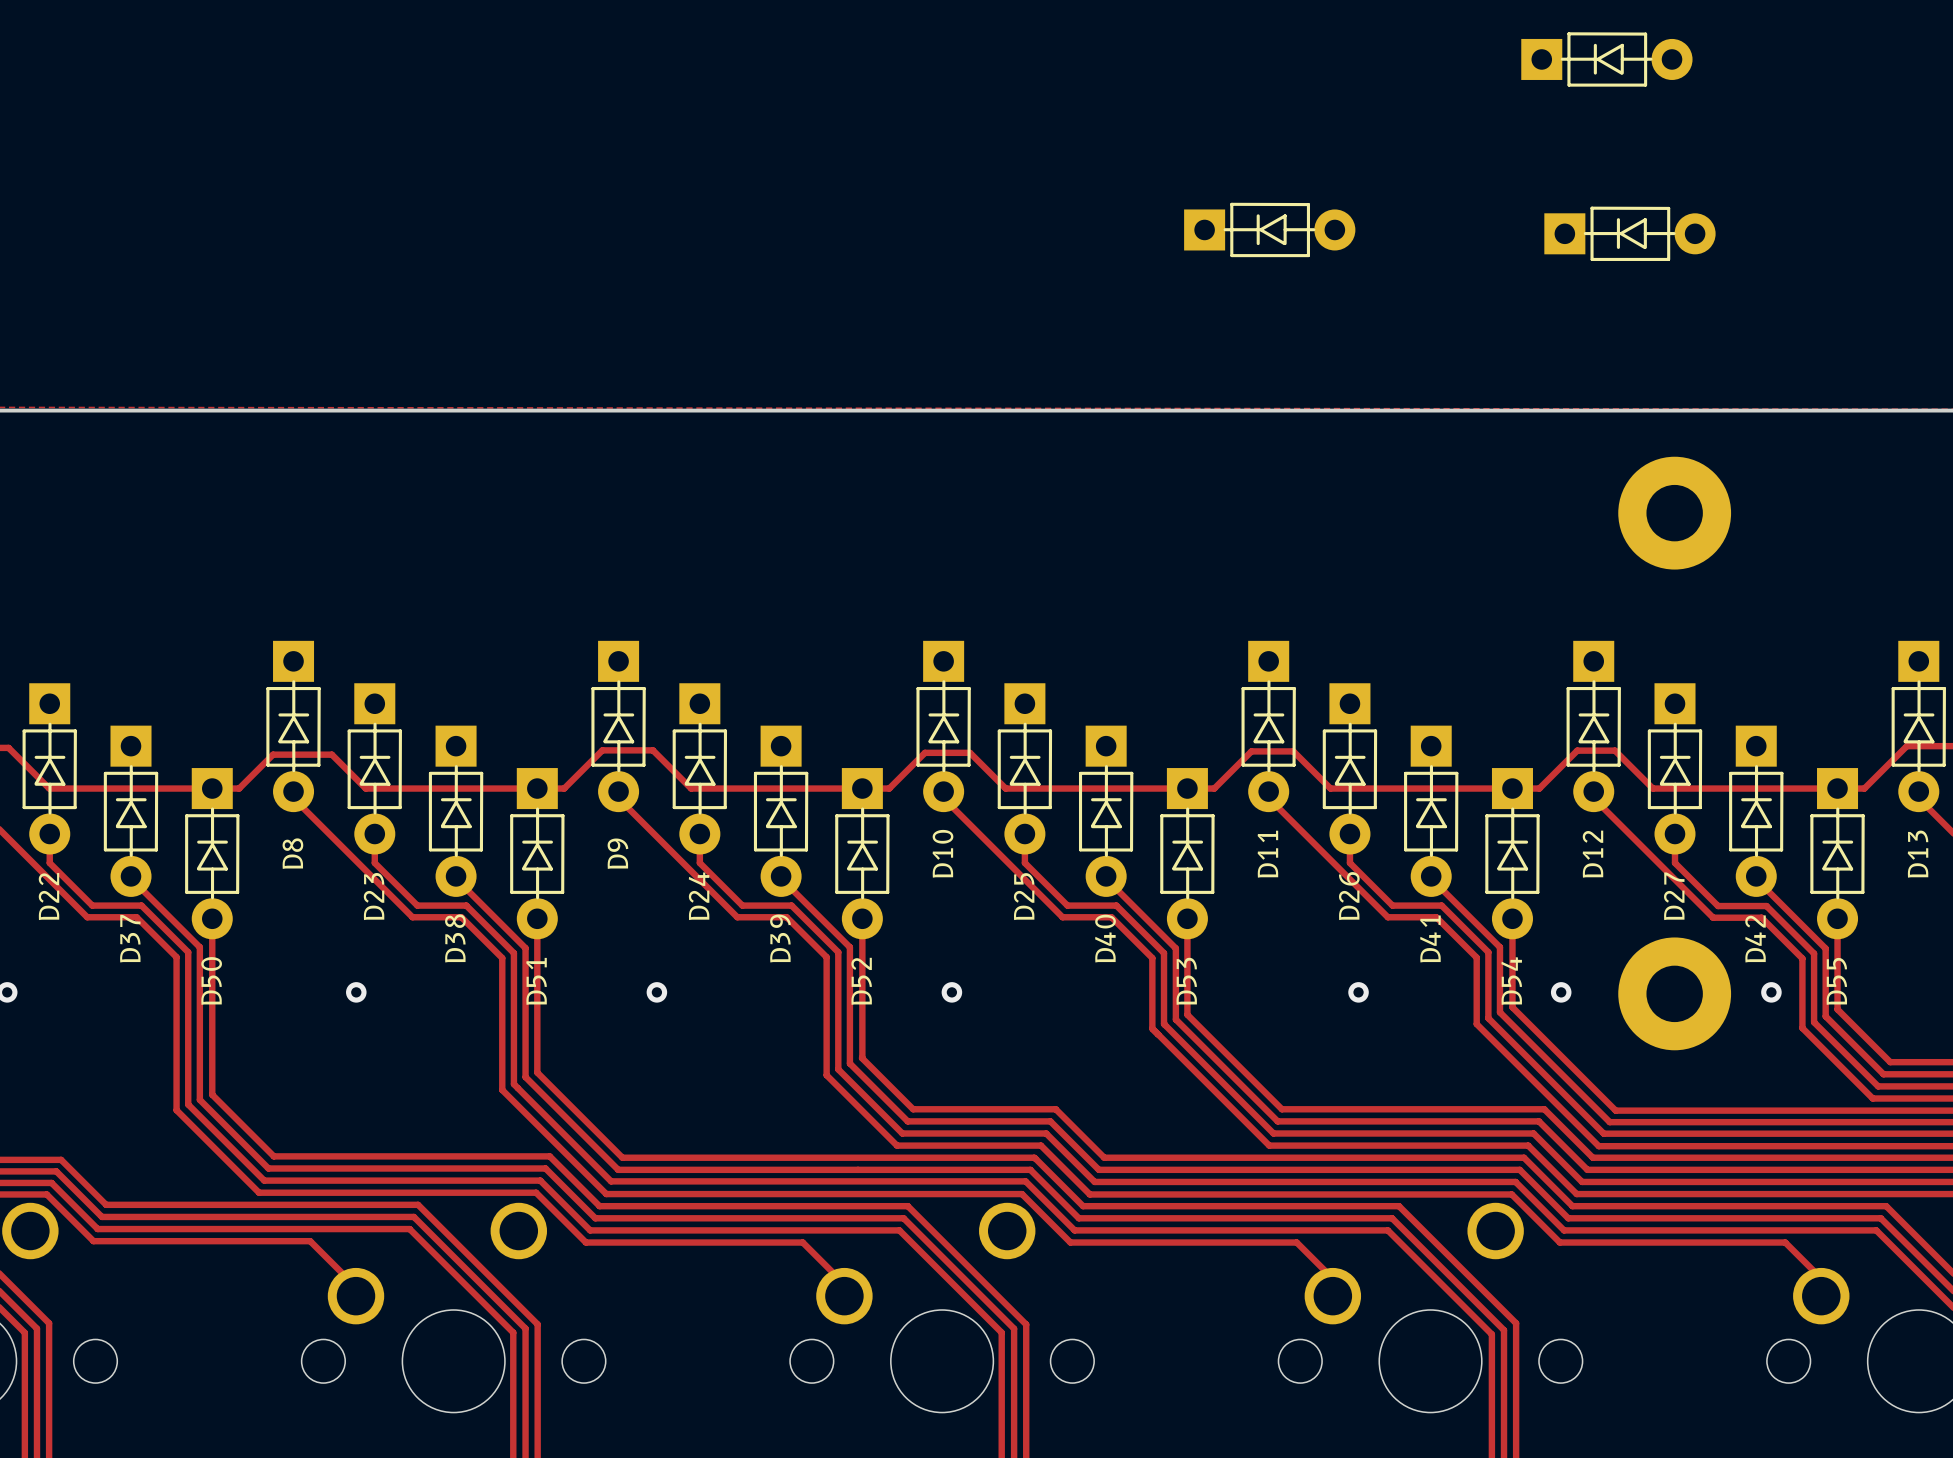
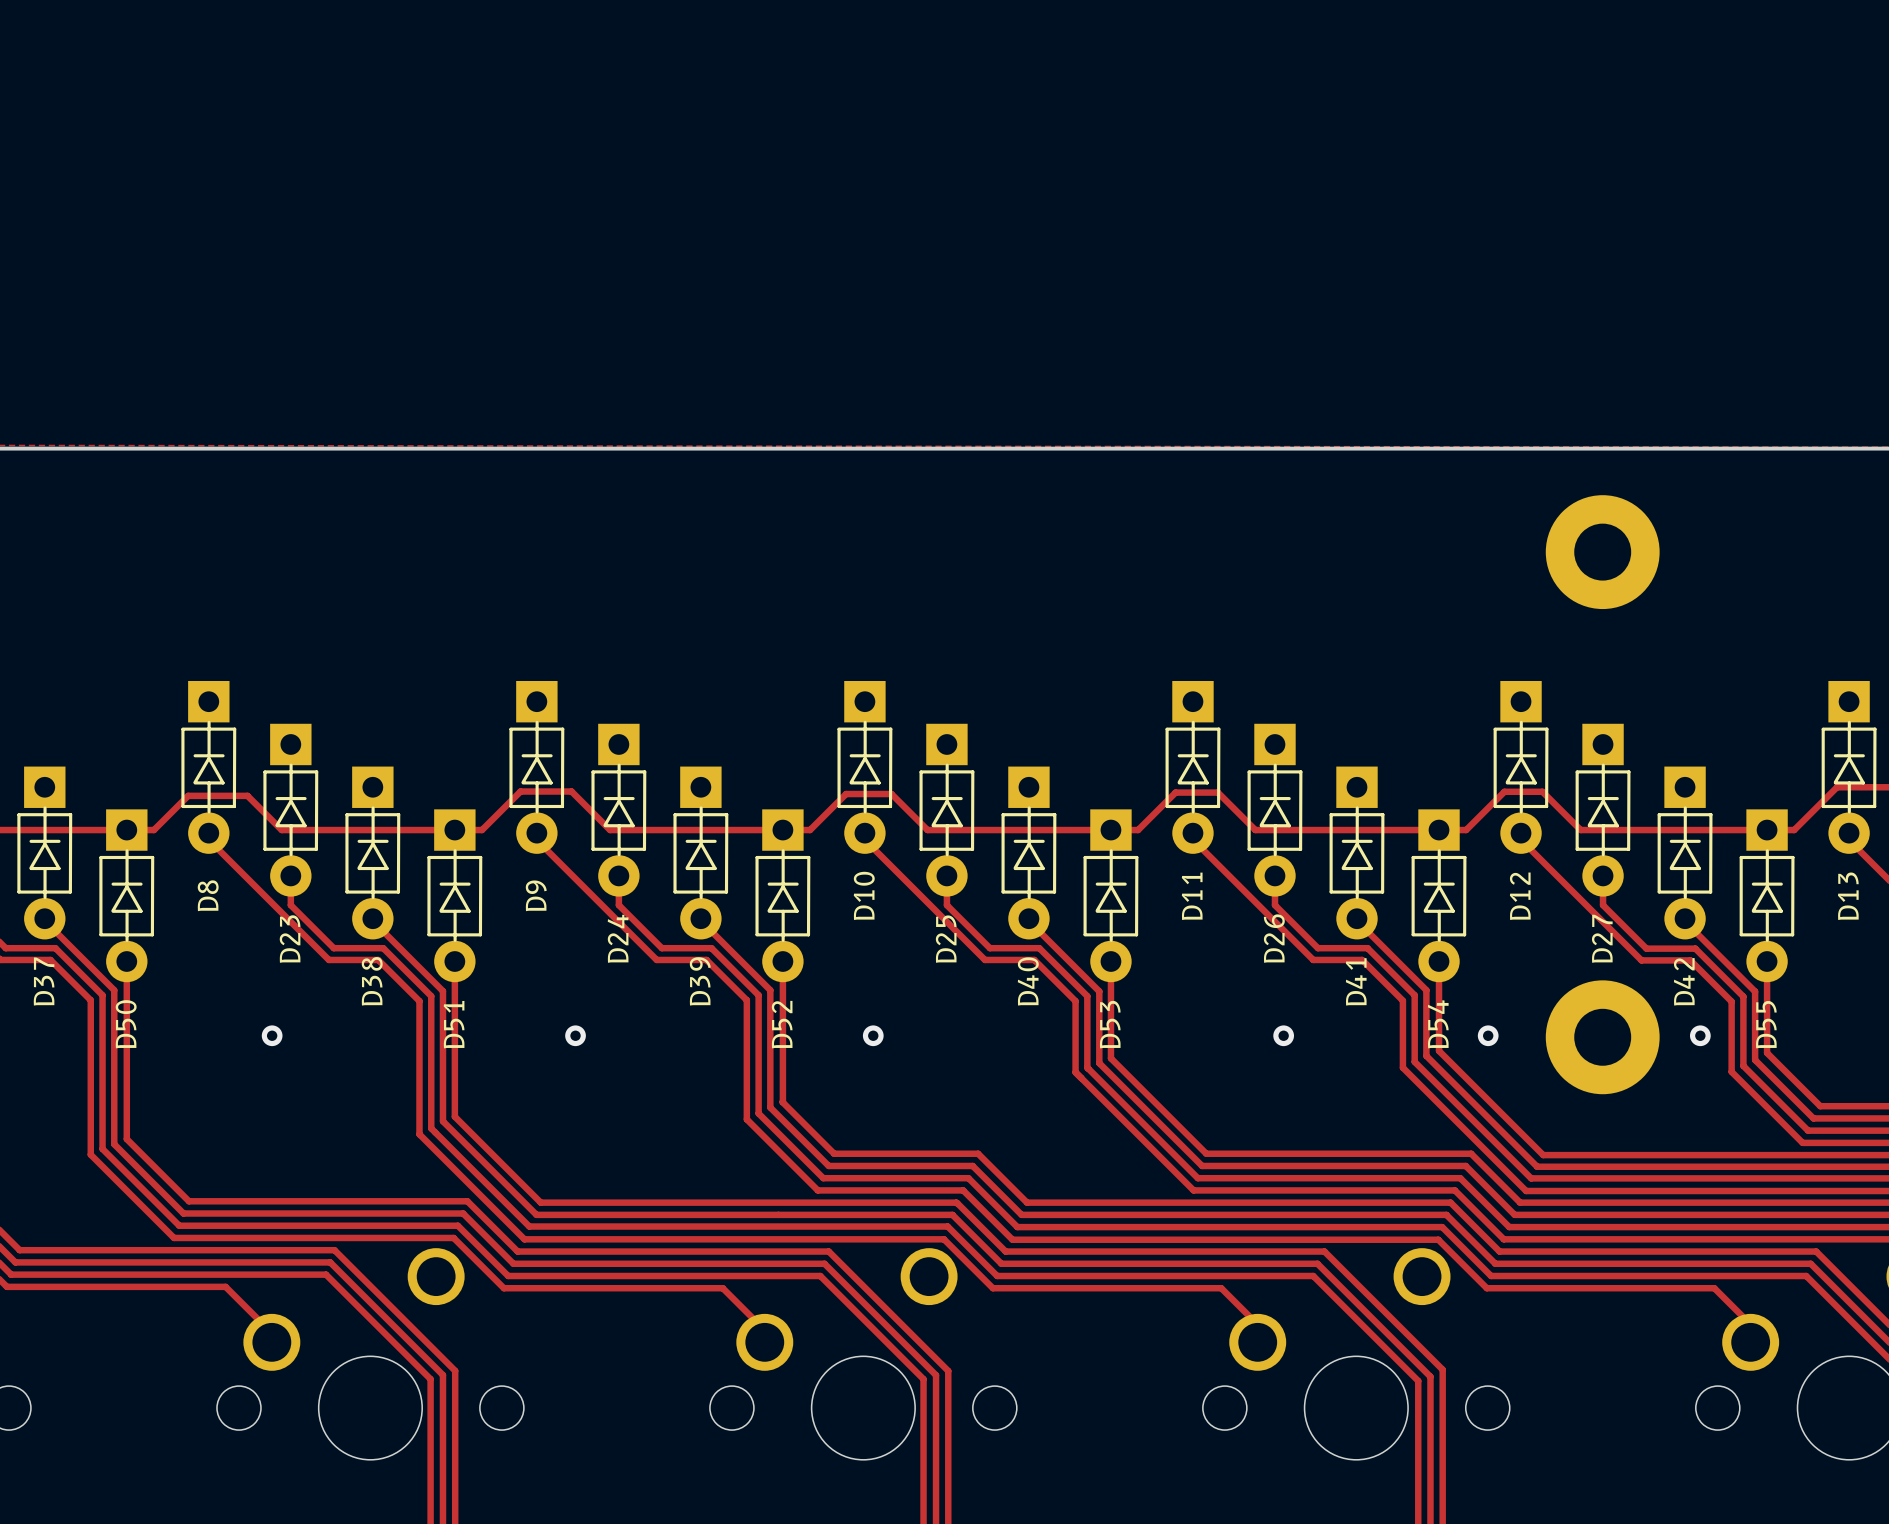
part: (1606, 59) -> none
part: (1269, 229) -> none
part: (1629, 233) -> none

